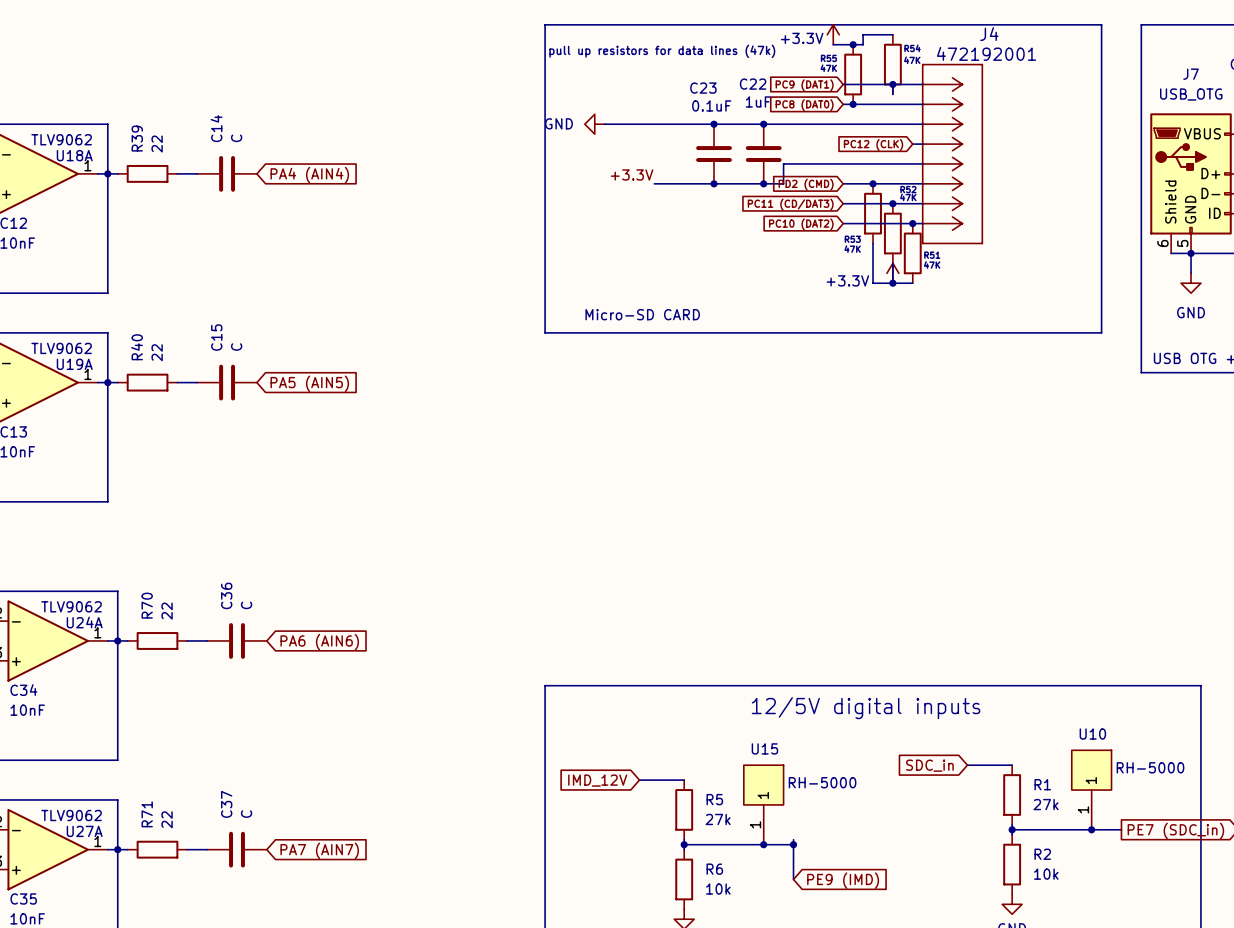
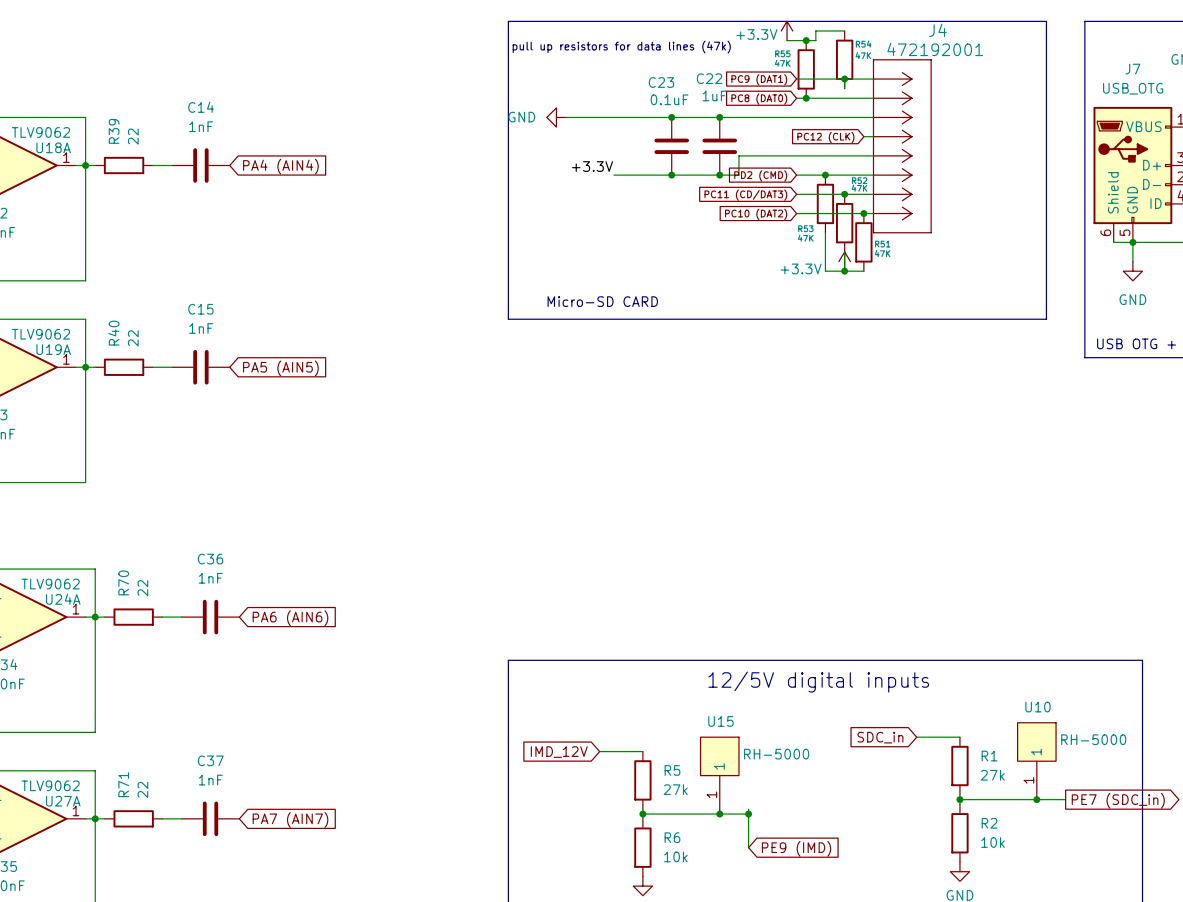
C14 name rotation: 0° (216, 128) -> 90° clockwise (201, 107)
C14 value: C (236, 138) -> 1nF (201, 126)
C15 name rotation: 0° (216, 337) -> 90° clockwise (200, 309)
C15 value: C (236, 347) -> 1nF (201, 328)
C36 name rotation: 0° (226, 595) -> 90° clockwise (210, 559)
C36 value: C (246, 605) -> 1nF (210, 578)
C37 name rotation: 0° (226, 804) -> 90° clockwise (210, 760)
C37 value: C (246, 814) -> 1nF (210, 780)

